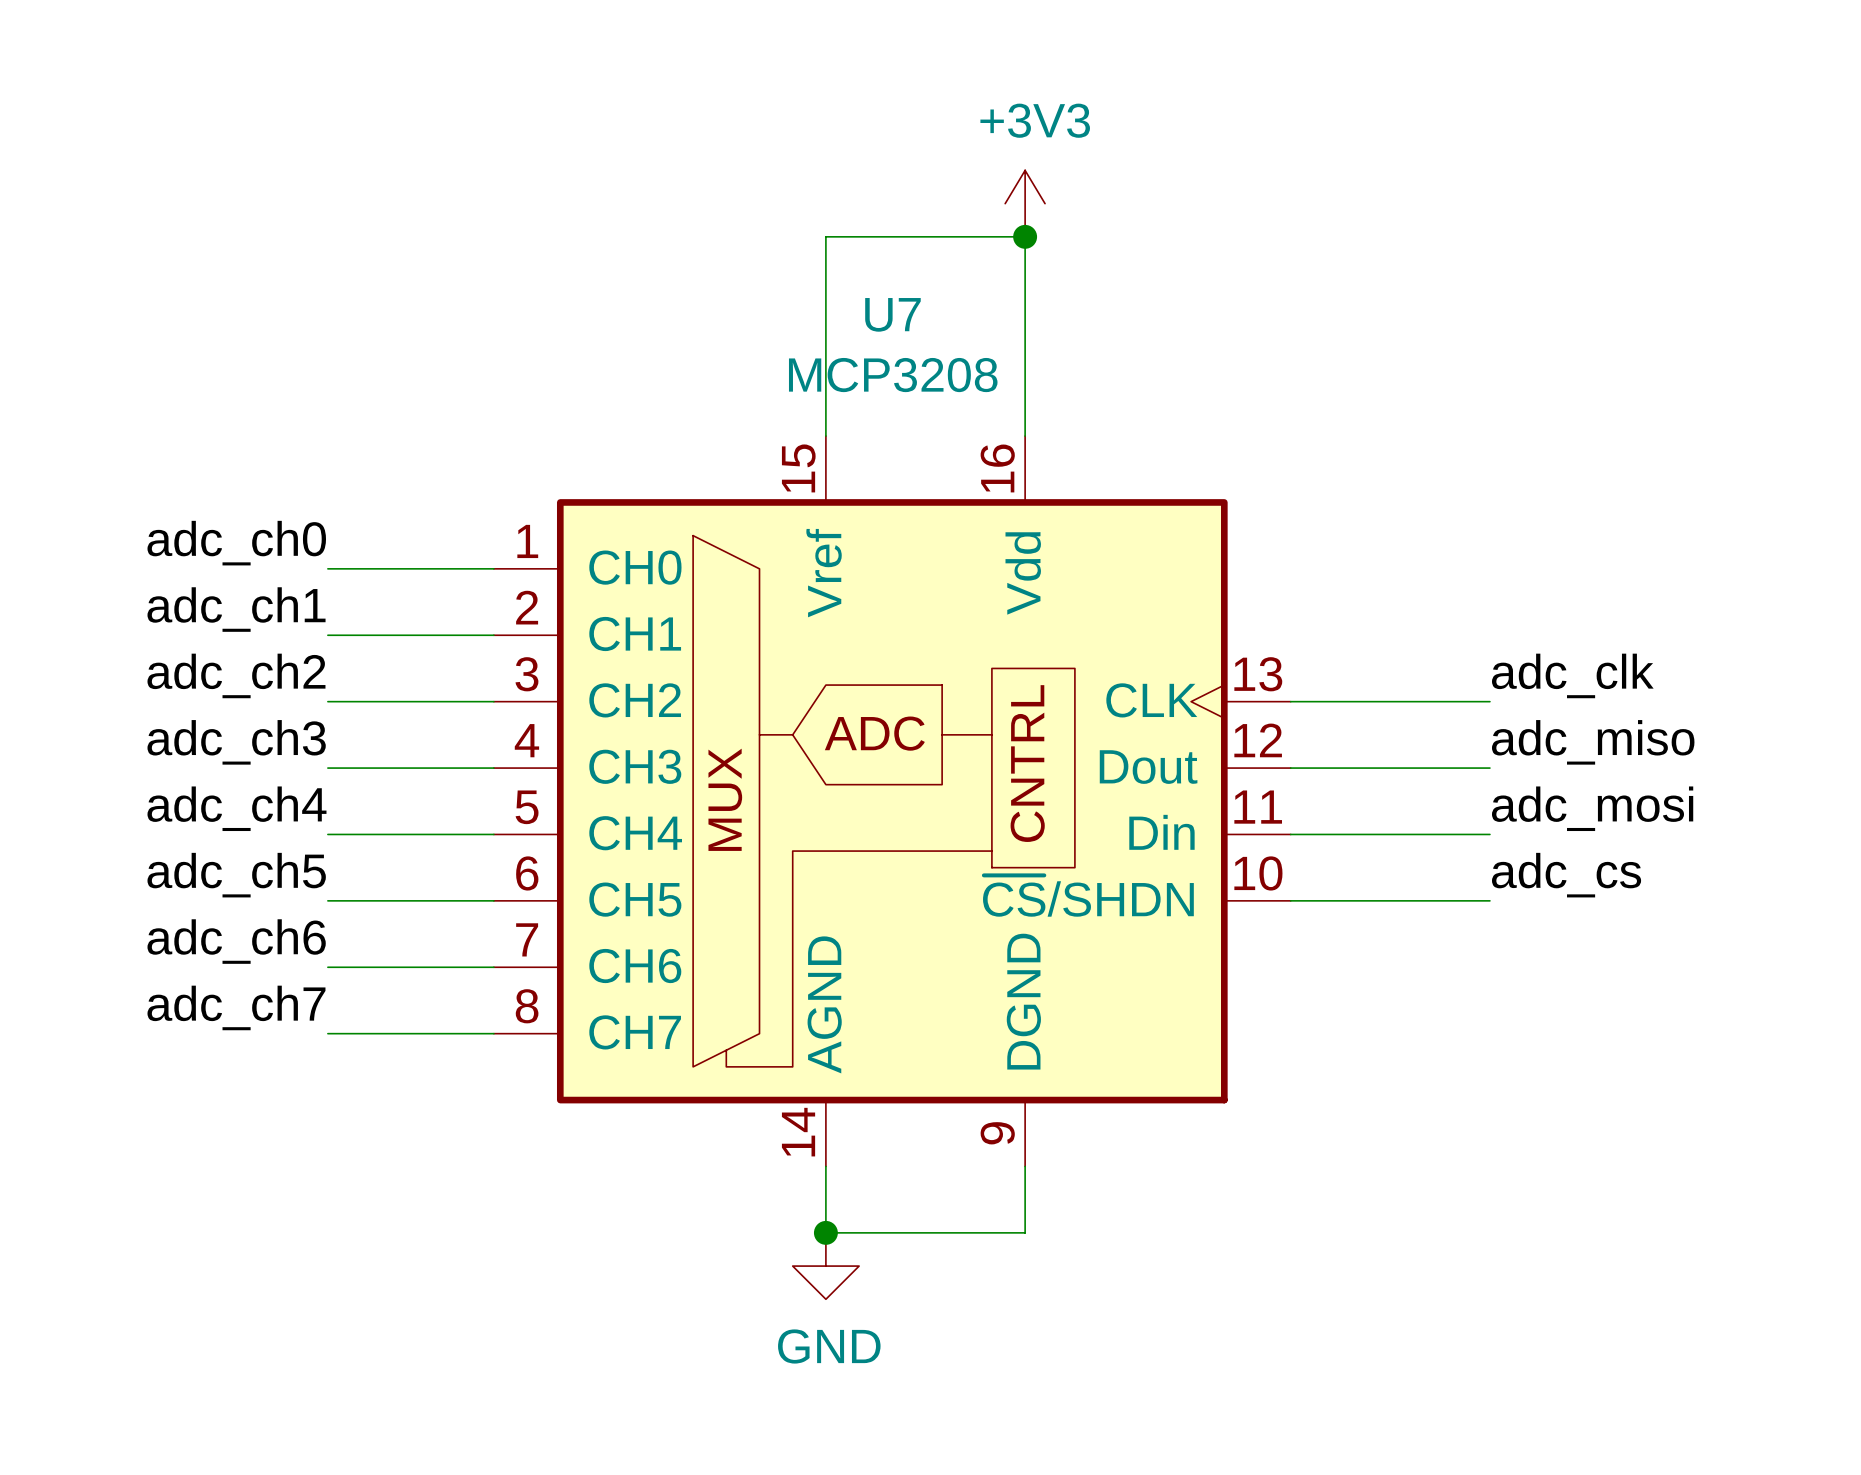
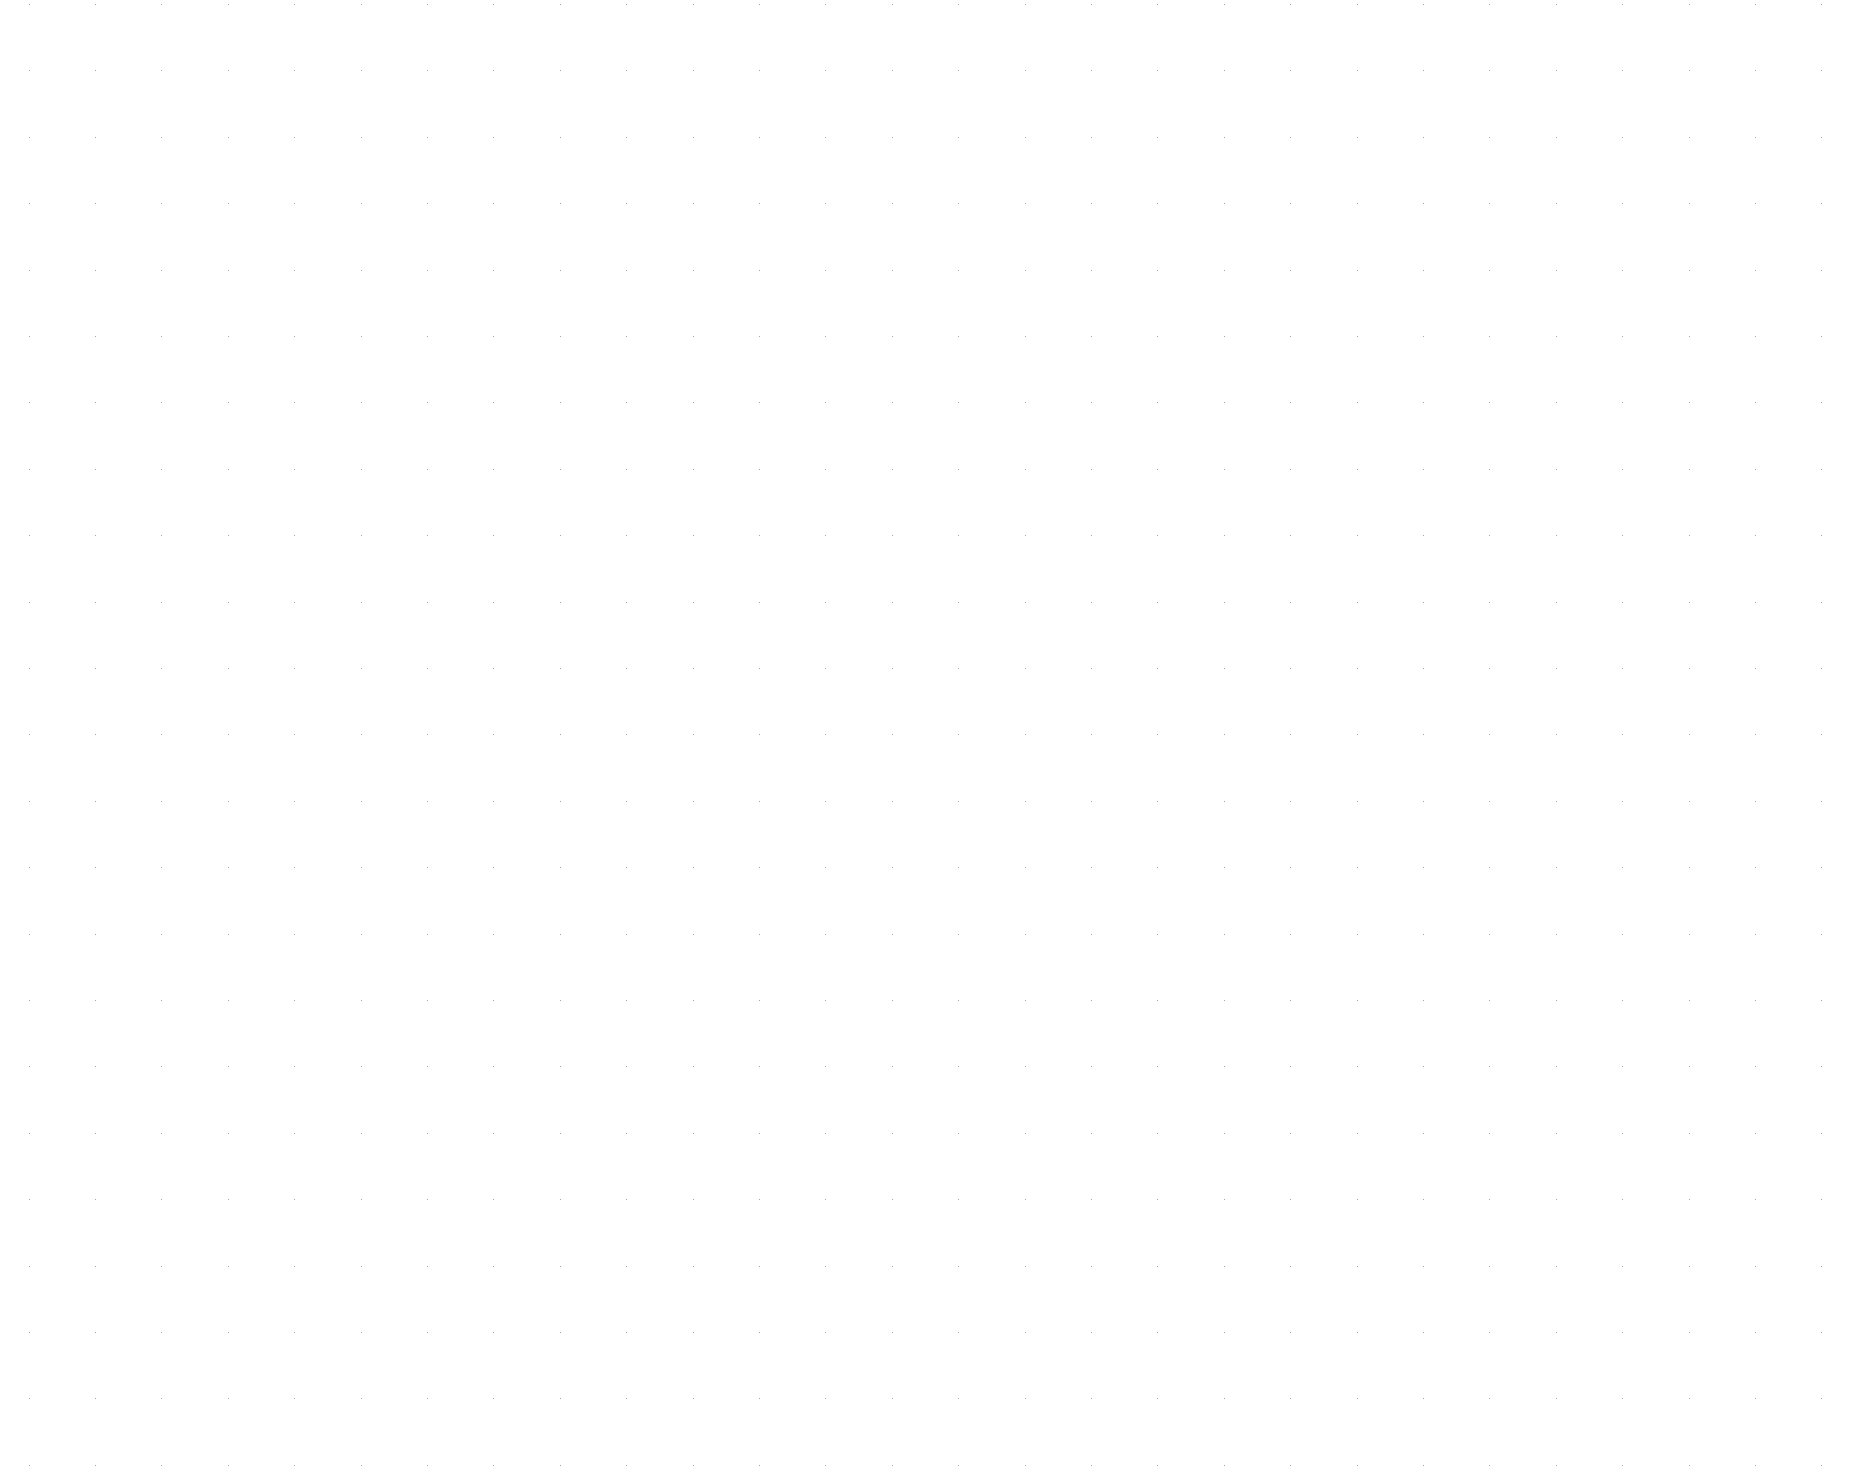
power symbol: +3V3 (1025, 203) -> none
junction: (1025, 236) -> none
wire: (825, 436) (825, 236) (1025, 236) (1025, 436) -> none
label: adc_ch0 (236, 543) -> none
wire: (327, 568) (493, 568) -> none
label: adc_ch1 (236, 609) -> none
wire: (327, 635) (493, 635) -> none
label: adc_ch2 (236, 675) -> none
label: adc_clk (1572, 675) -> none
wire: (327, 701) (493, 701) -> none
wire: (1290, 701) (1489, 701) -> none
label: adc_ch3 (236, 742) -> none
label: adc_miso (1593, 742) -> none
wire: (327, 768) (493, 768) -> none
wire: (1290, 768) (1489, 768) -> none
U7: MCP3208 (892, 801) -> none
label: adc_ch4 (236, 808) -> none
label: adc_mosi (1592, 808) -> none
wire: (327, 834) (493, 834) -> none
wire: (1290, 834) (1489, 834) -> none
label: adc_ch5 (236, 875) -> none
label: adc_cs (1566, 875) -> none
wire: (327, 900) (493, 900) -> none
wire: (1290, 900) (1489, 900) -> none
label: adc_ch6 (236, 941) -> none
wire: (327, 967) (493, 967) -> none
label: adc_ch7 (236, 1007) -> none
wire: (327, 1033) (493, 1033) -> none
wire: (825, 1166) (825, 1232) (1025, 1232) (1025, 1166) -> none
junction: (825, 1232) -> none
power symbol: GND (825, 1266) -> none

